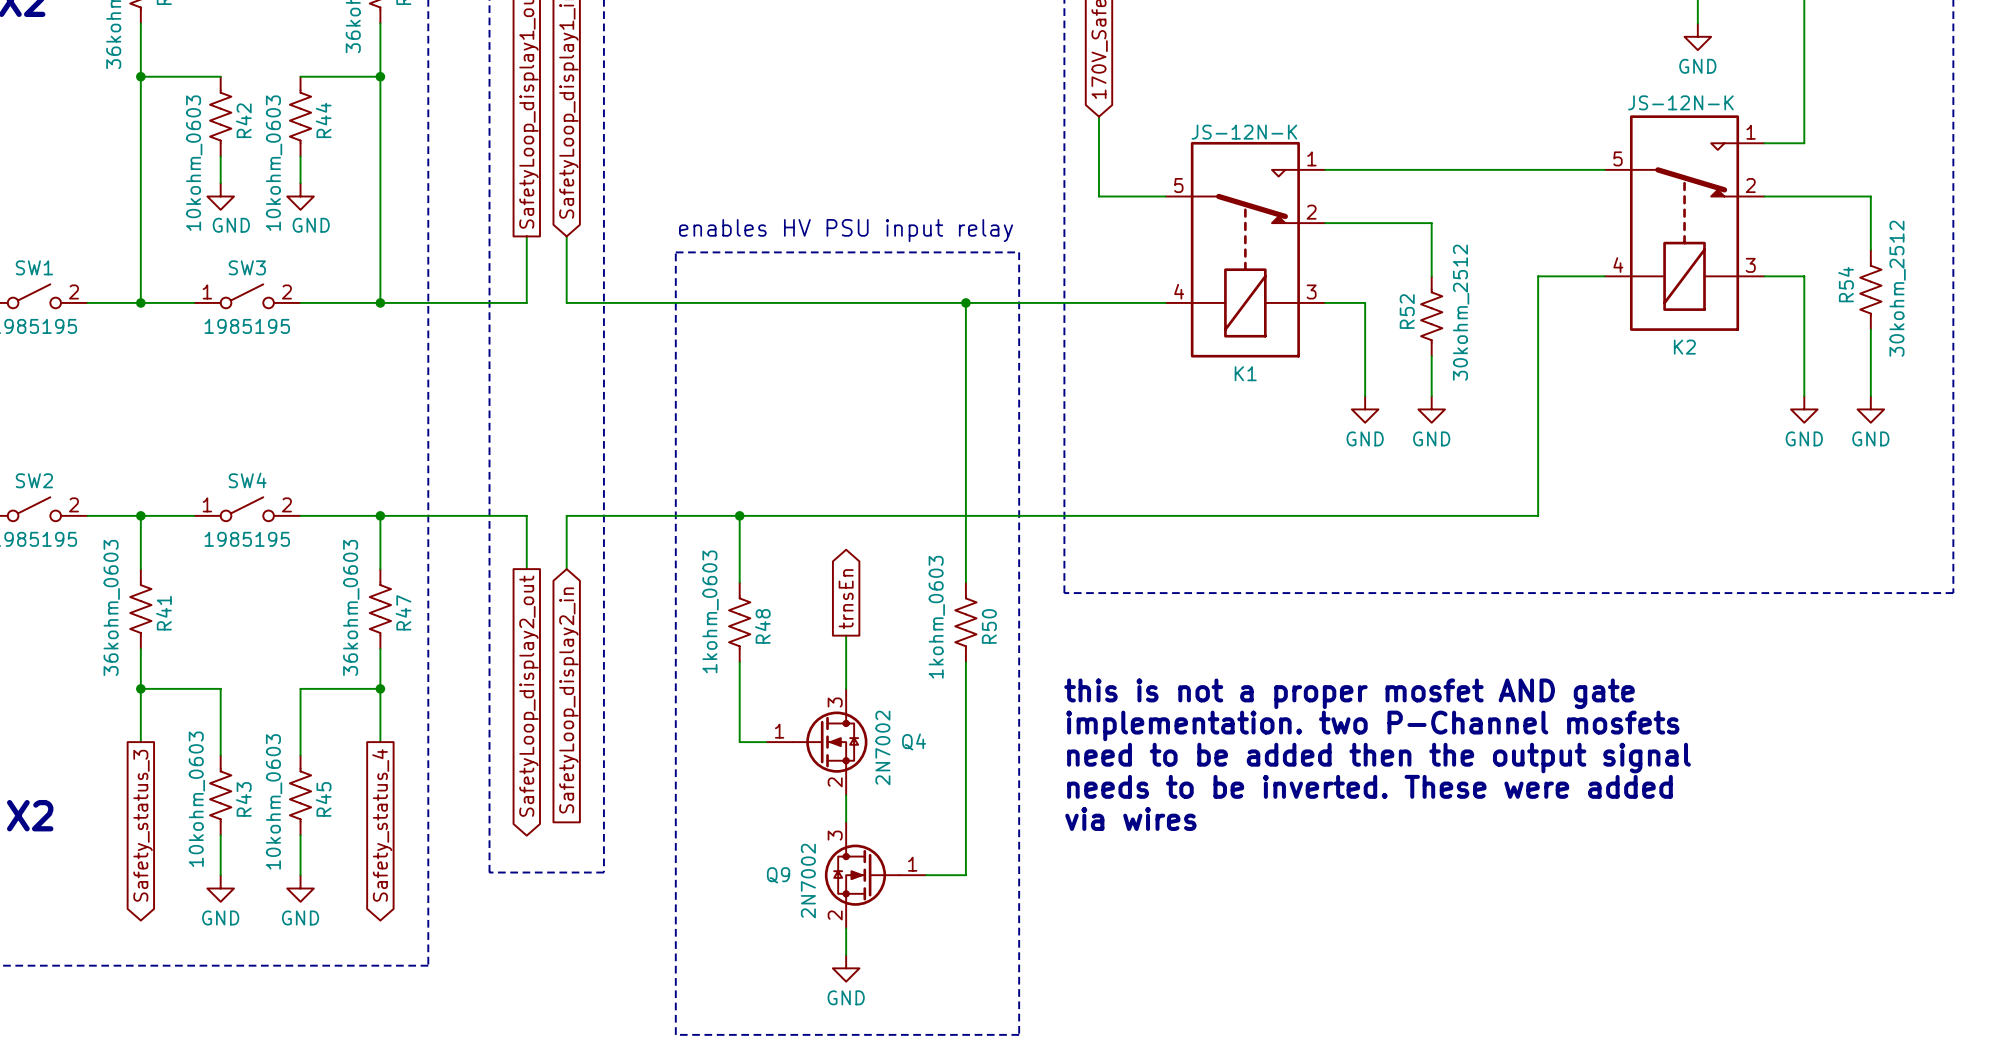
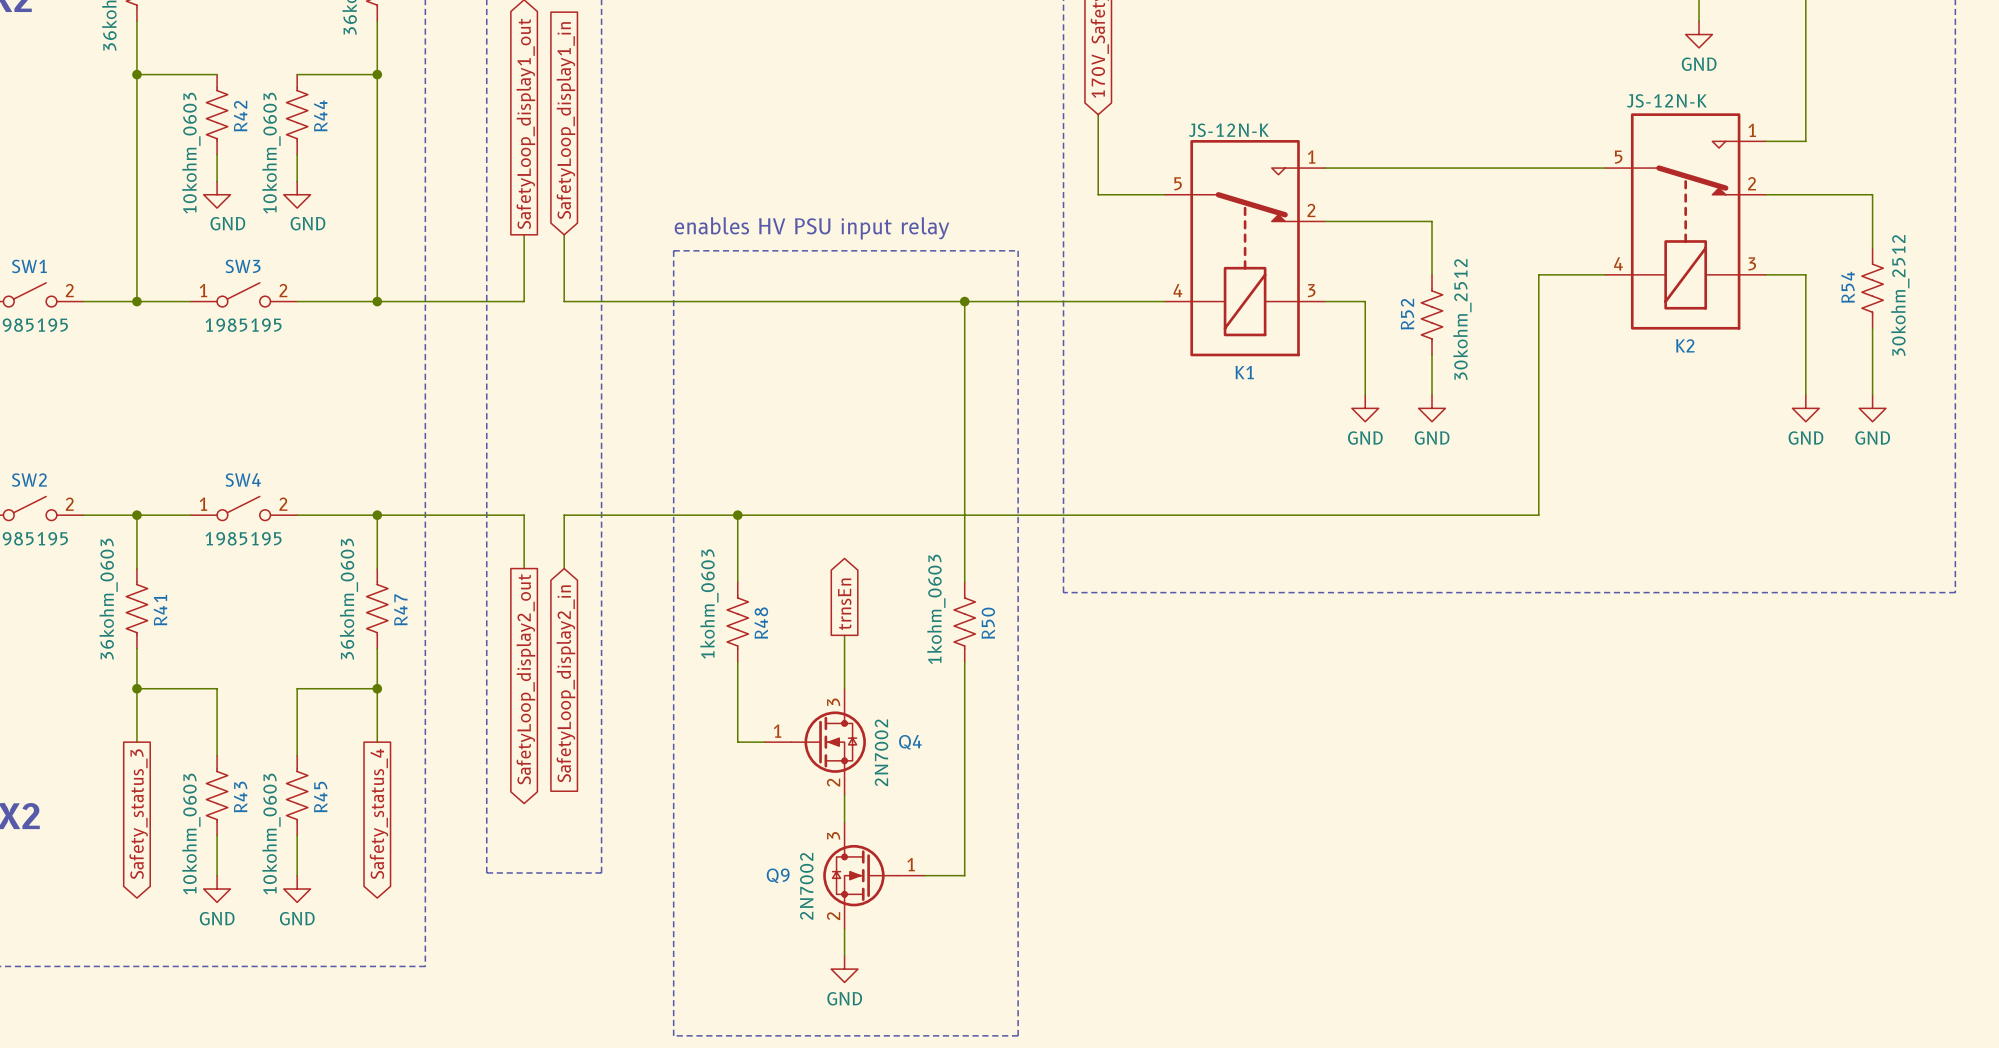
text: this is not a proper mosfet AND gate (1349, 693) -> none
text: implementation. two P-Channel mosfets (1372, 725) -> none
text: need to be added then the output signal (1378, 758) -> none
text: needs to be inverted. These were added (1369, 786) -> none
R43 value position: 10kohm_0603 (196, 799) -> 10kohm_0603 (191, 834)
R45 value position: 10kohm_0603 (274, 801) -> 10kohm_0603 (271, 834)
text: via wires (1130, 818) -> none

